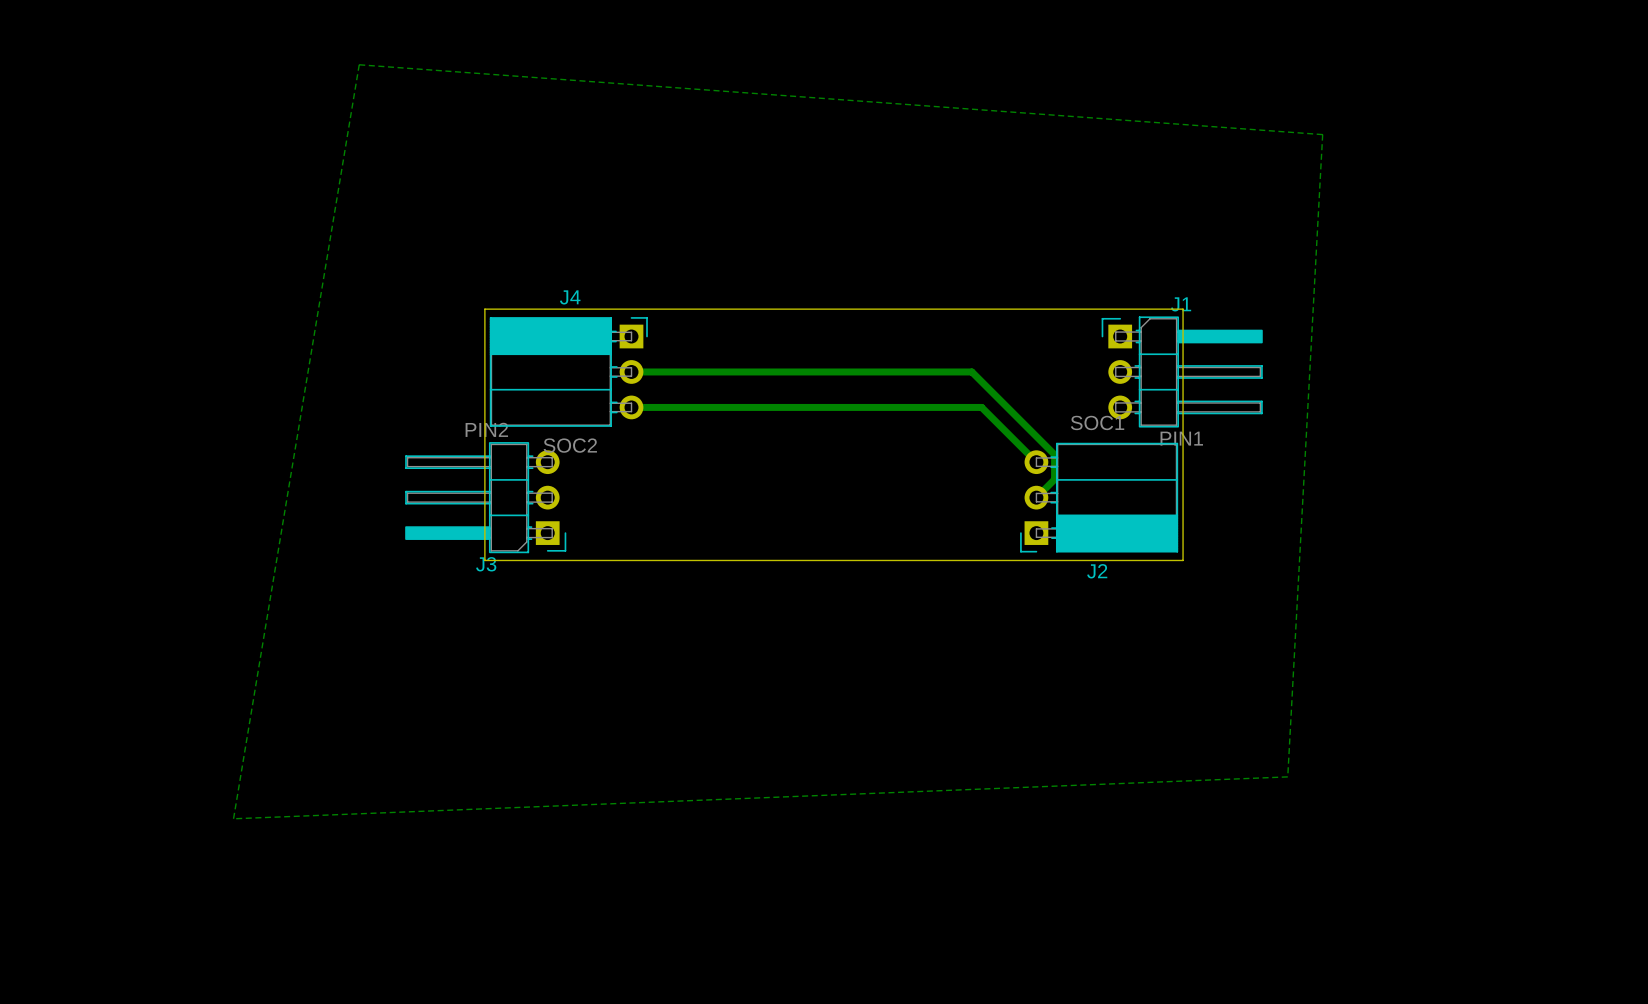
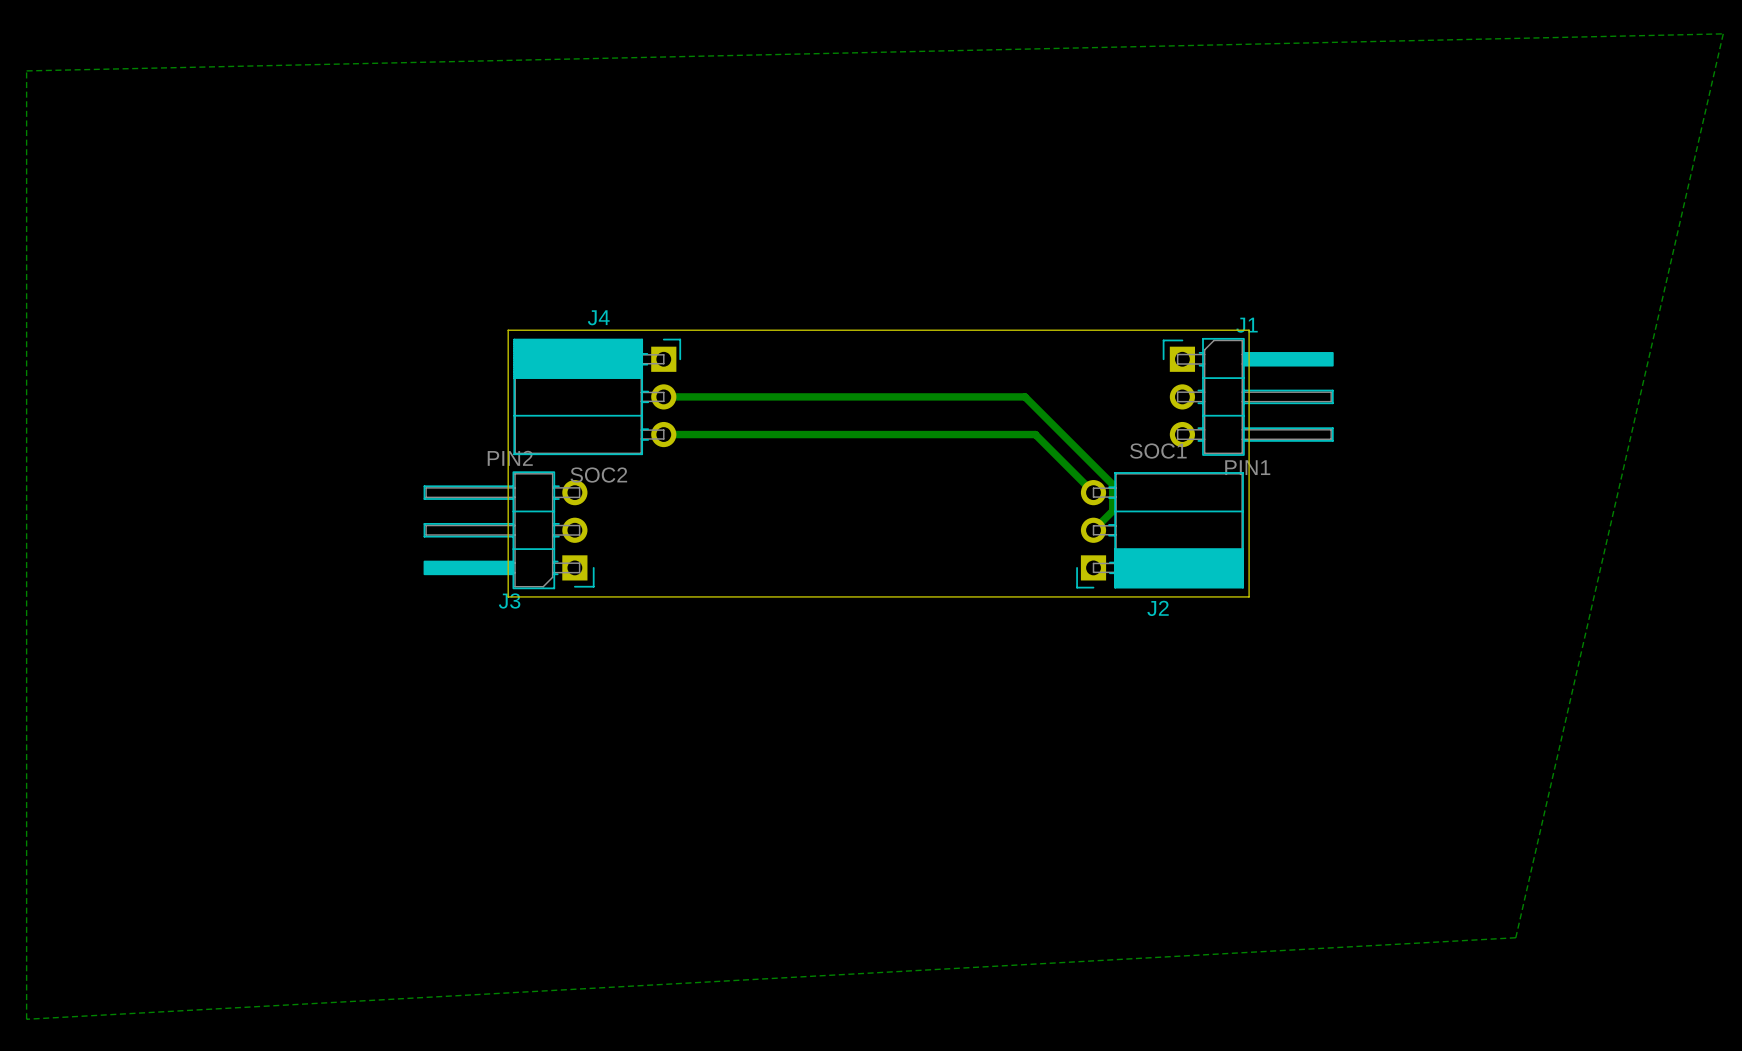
zone outline: (359, 64) (233, 818) (1287, 776) (1322, 134) (359, 64) -> (1723, 33) (1515, 937) (26, 1019) (26, 70) (1723, 33)

